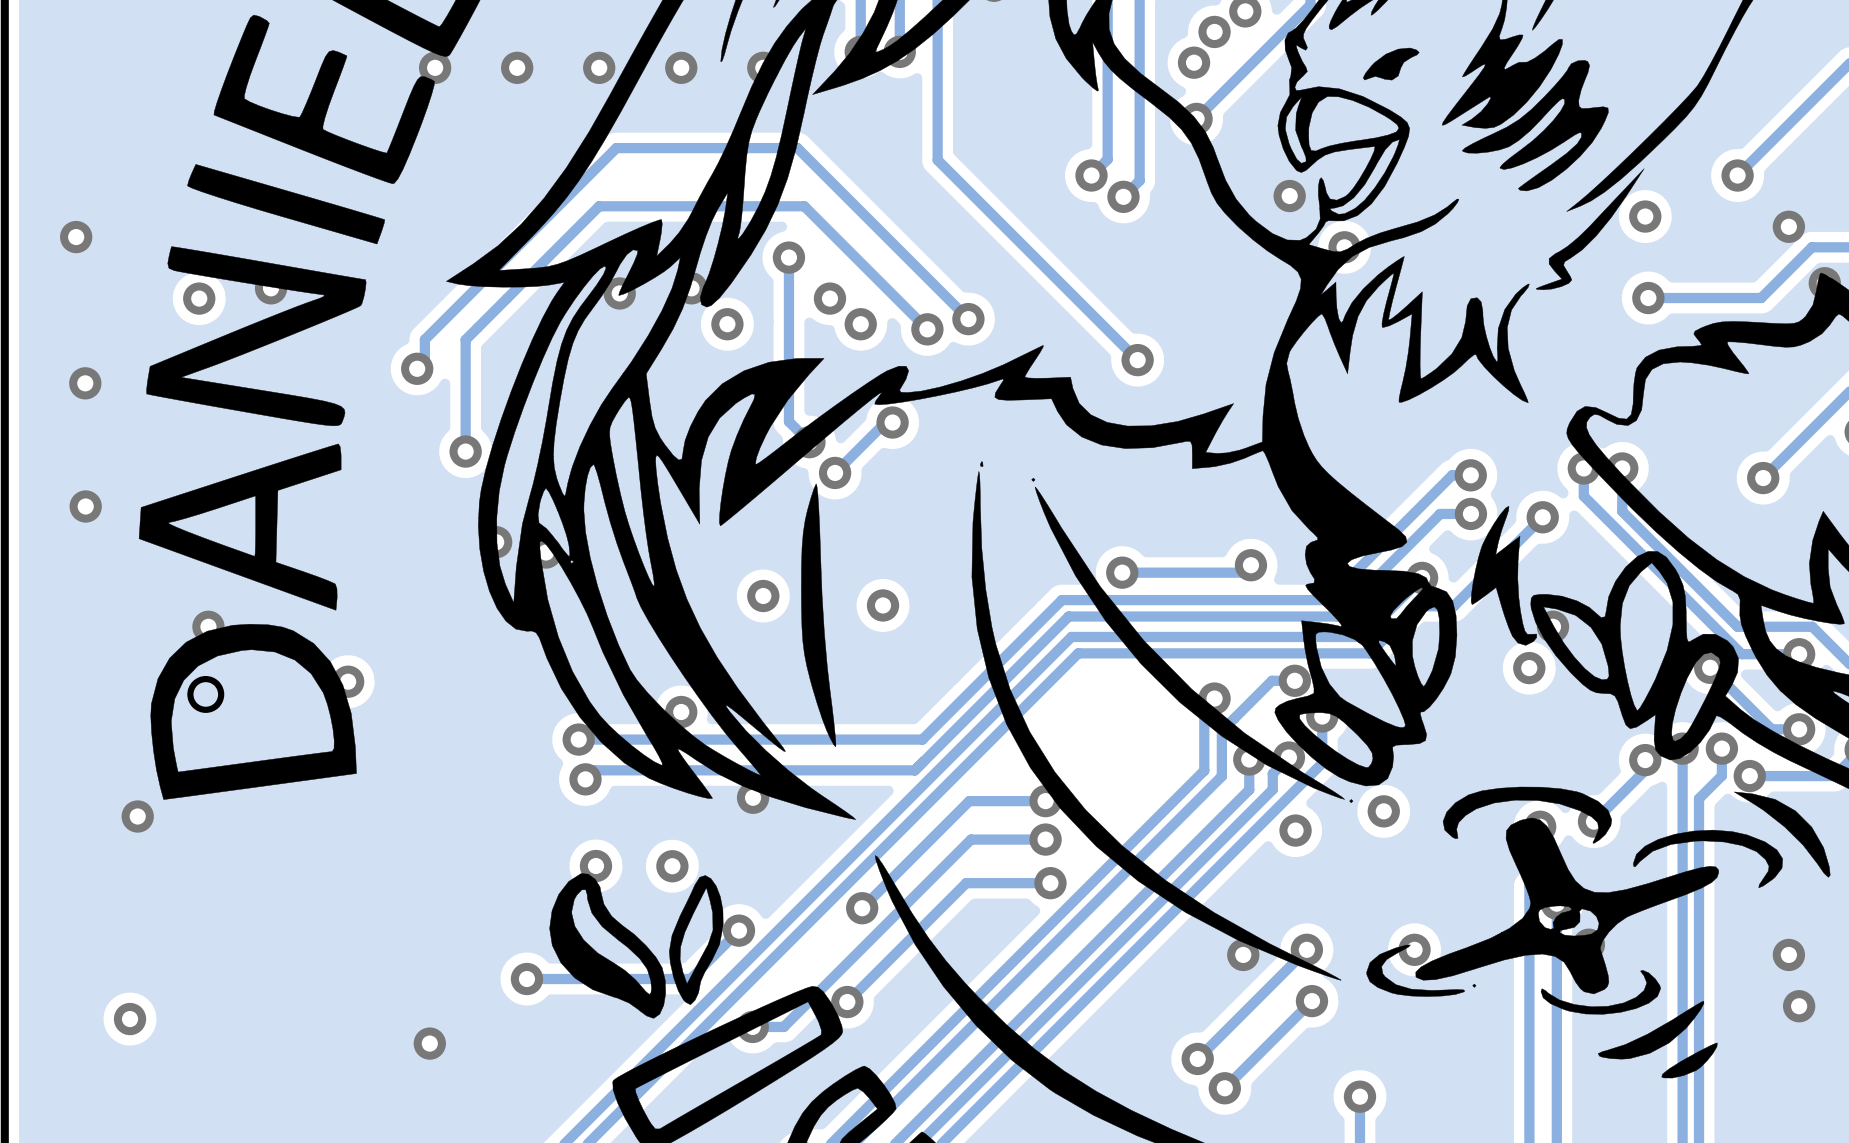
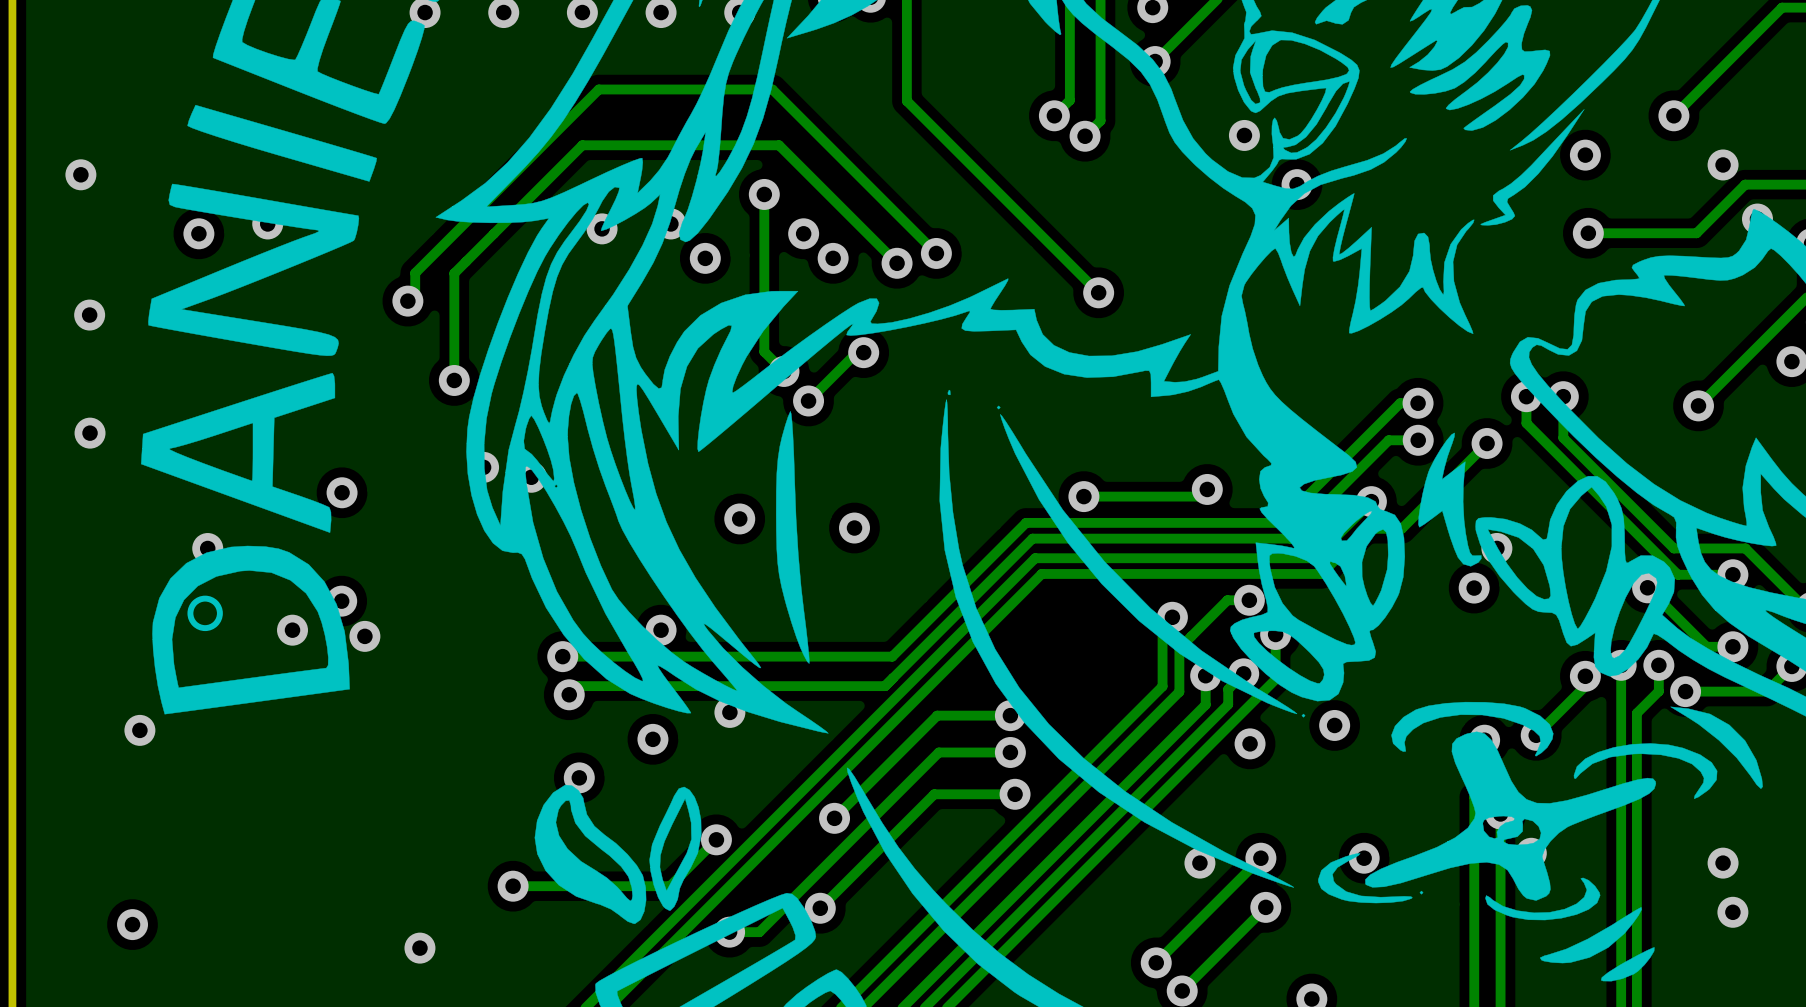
via: none -> (342, 492)
via: none -> (292, 630)
via: none -> (364, 636)
via position: (672, 866) -> (652, 739)

